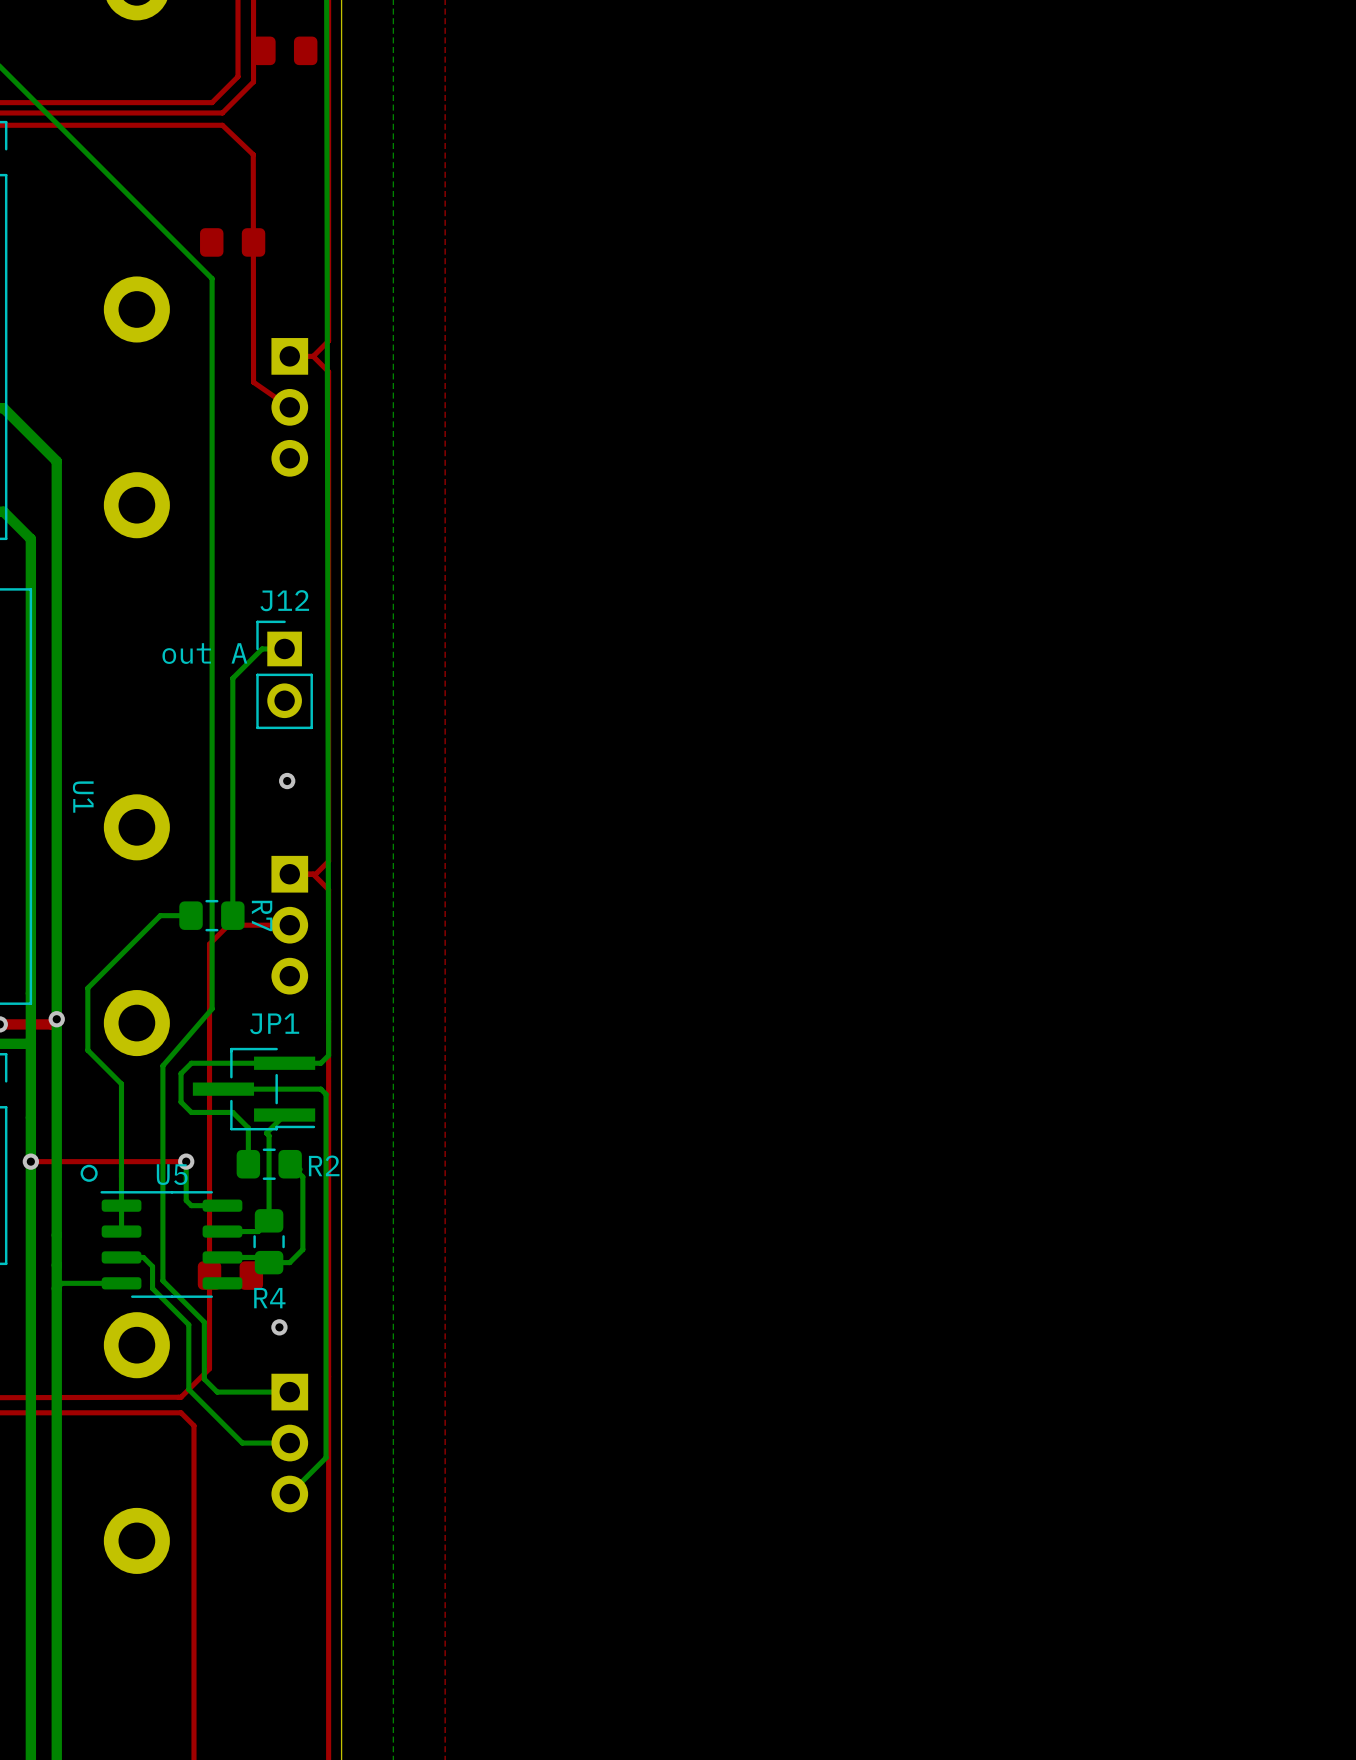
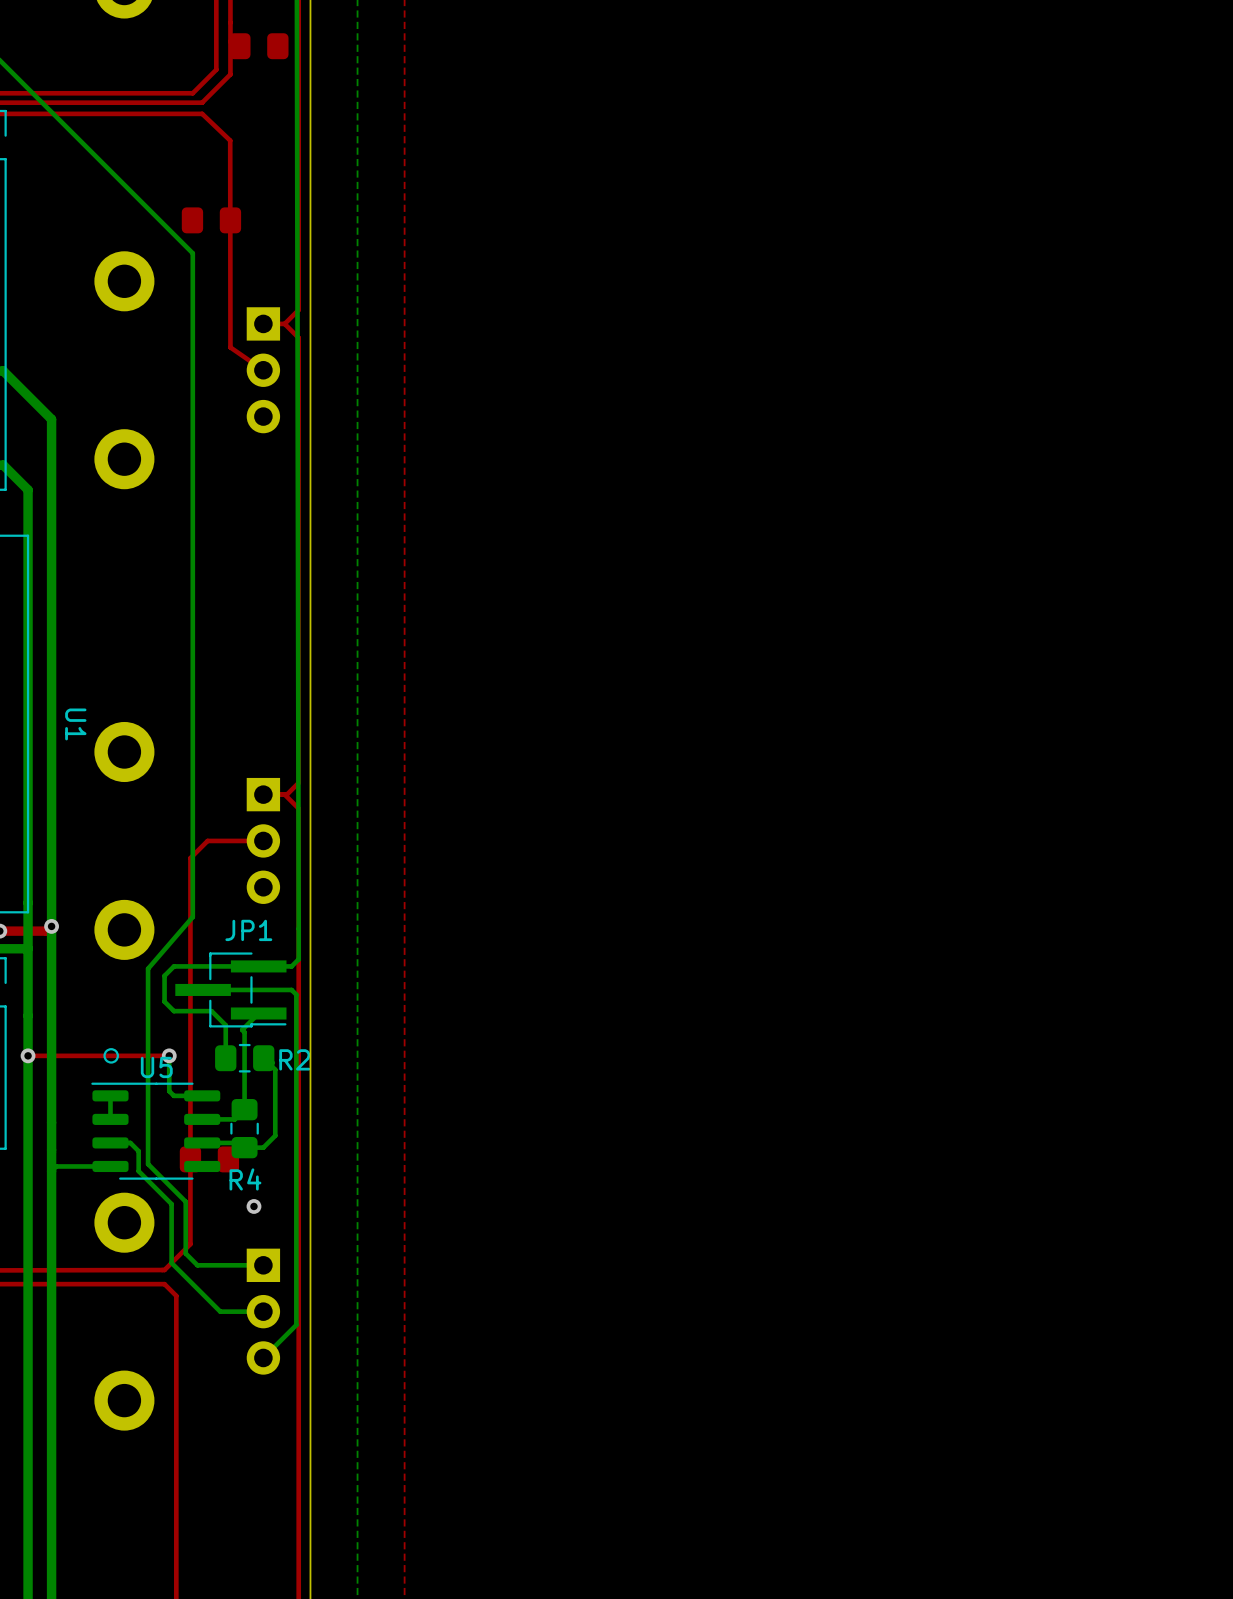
bottom track: (284, 648) (262, 648) (232, 678) (232, 915) -> none
text: out A (204, 653) -> none
J12: (284, 674) -> none
via: (287, 781) -> none
bottom track: (191, 915) (160, 915) (87, 988) (87, 1050) (121, 1083) (121, 1205) -> none
R7: (211, 915) -> none
drawing position: (89, 1173) -> (111, 1055)

